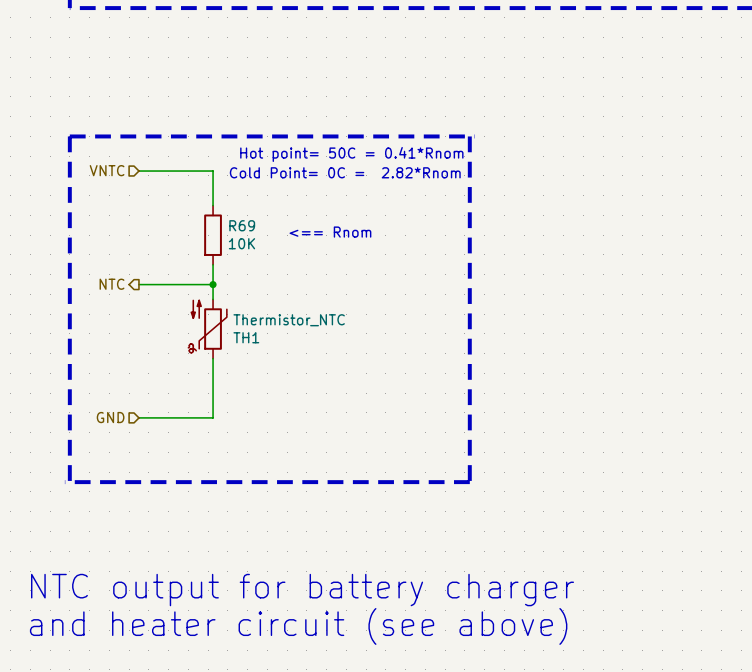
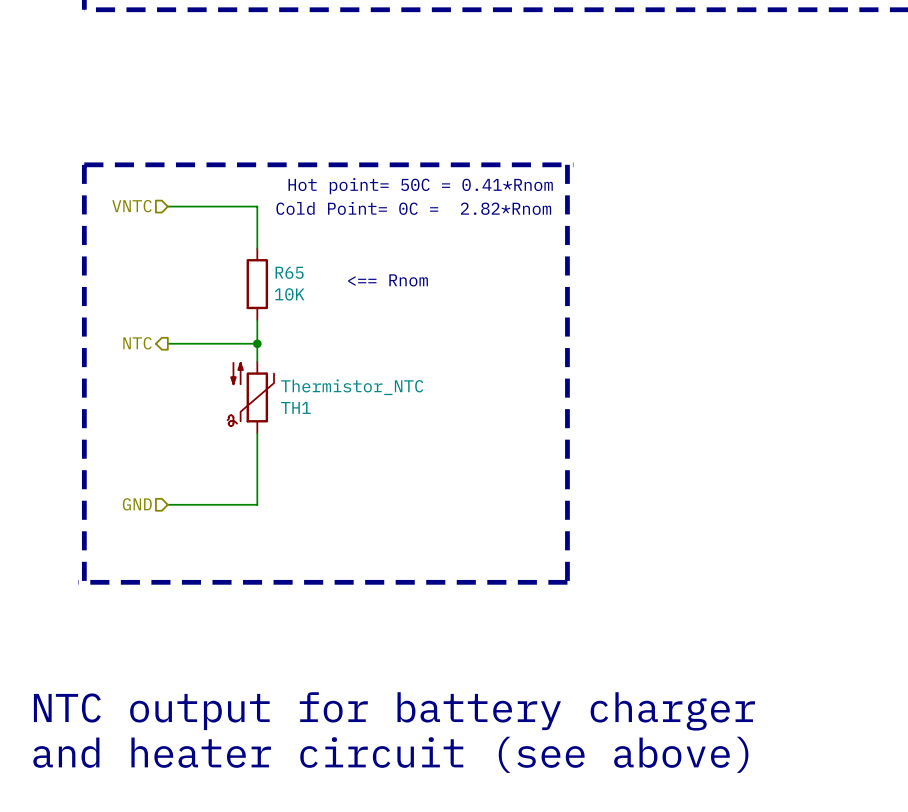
R69 name: R69 (242, 225) -> R65 (289, 272)

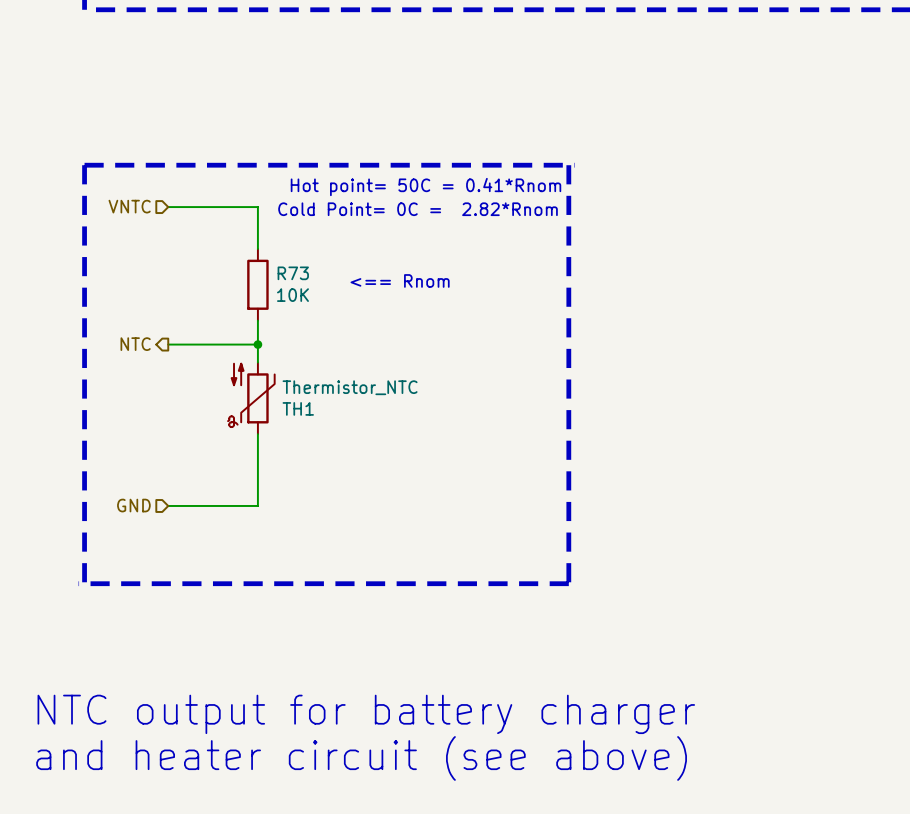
R65 name: R65 (289, 272) -> R73 (293, 273)

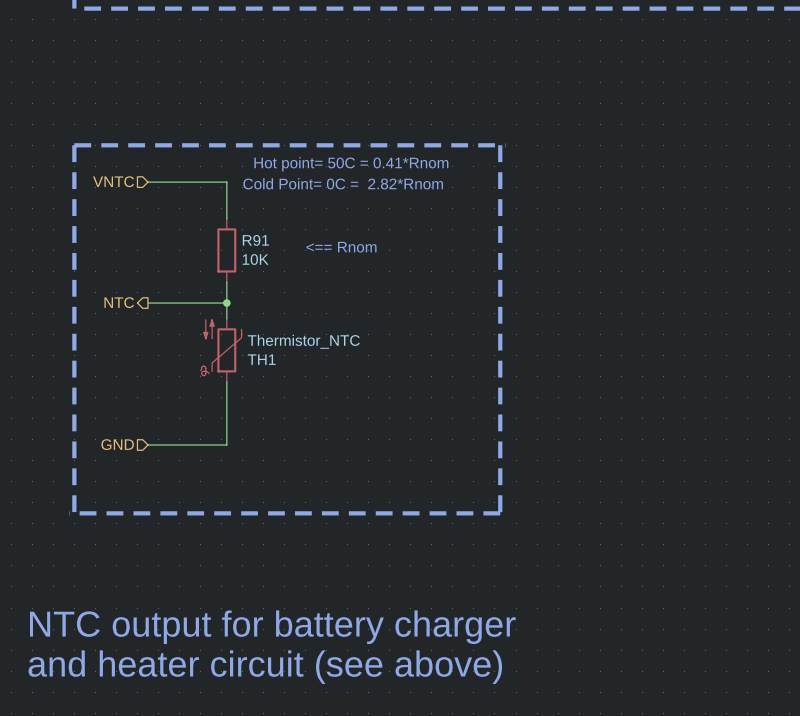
R73 name: R73 (293, 273) -> R91 (255, 240)

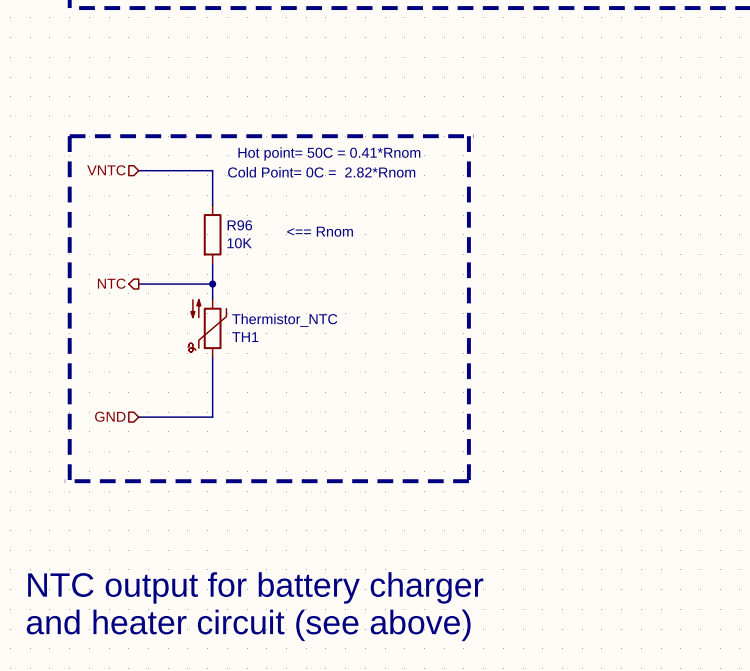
R91 name: R91 (255, 240) -> R96 (239, 225)

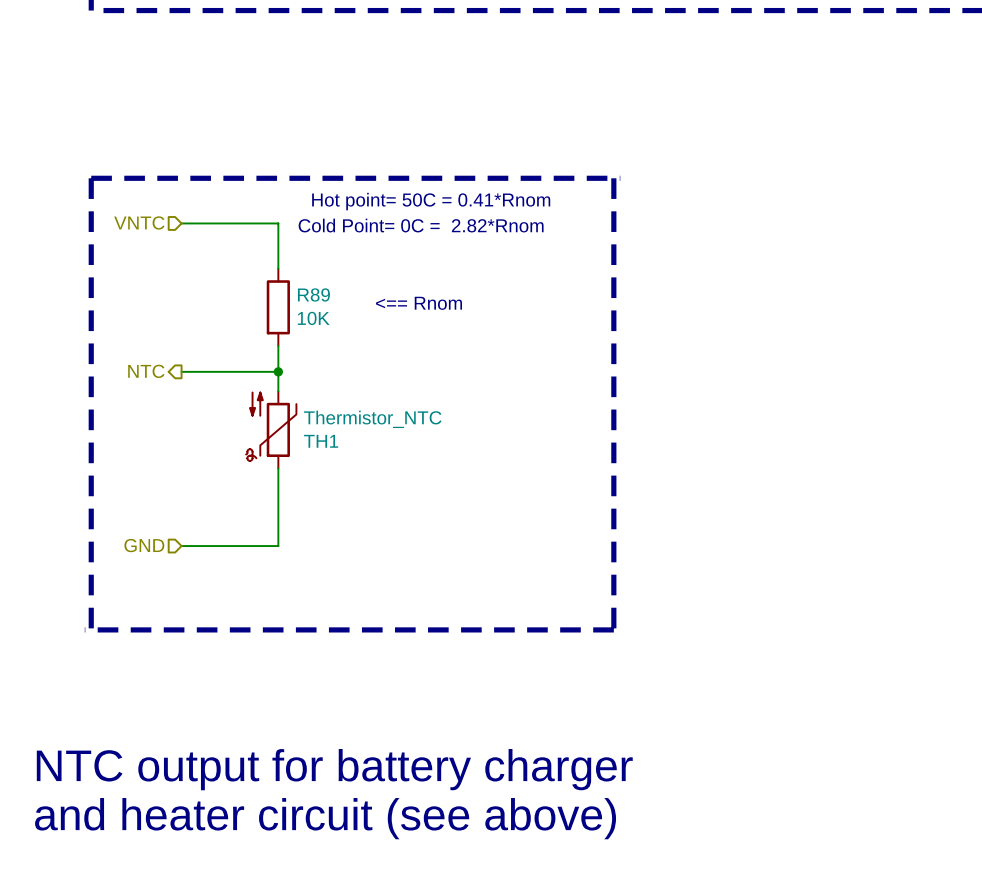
R96 name: R96 (239, 225) -> R89 (313, 294)

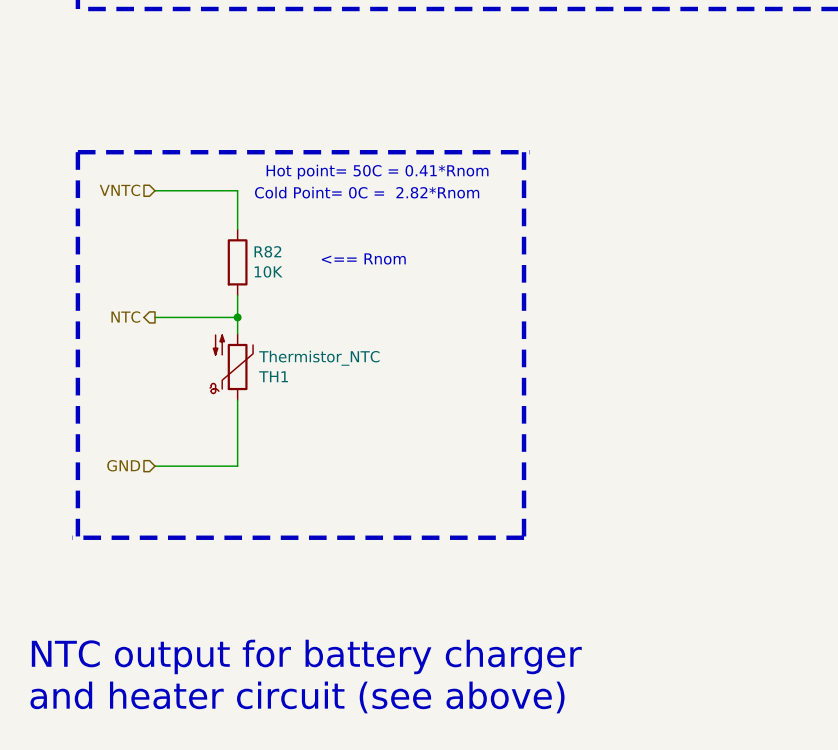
R89 name: R89 (313, 294) -> R82 (267, 251)

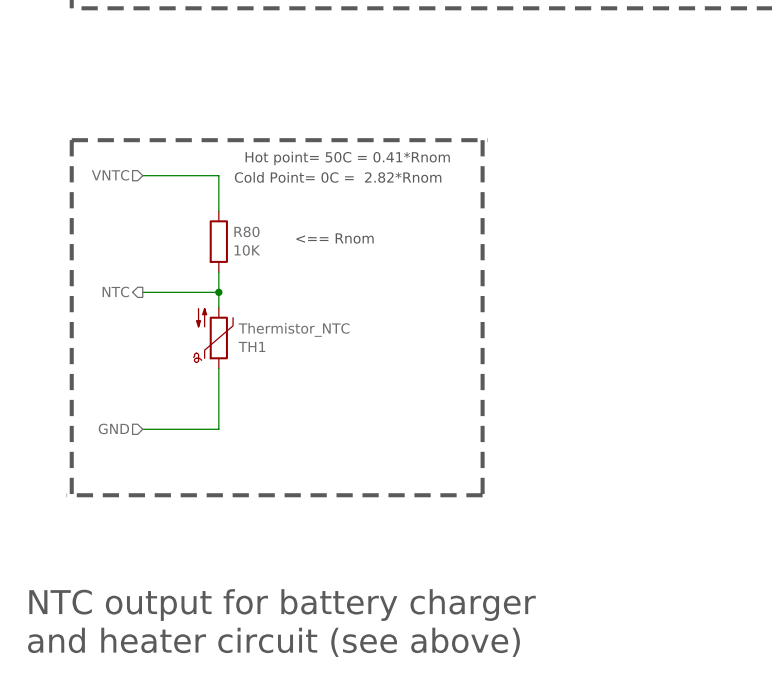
R82 name: R82 (267, 251) -> R80 (246, 231)

